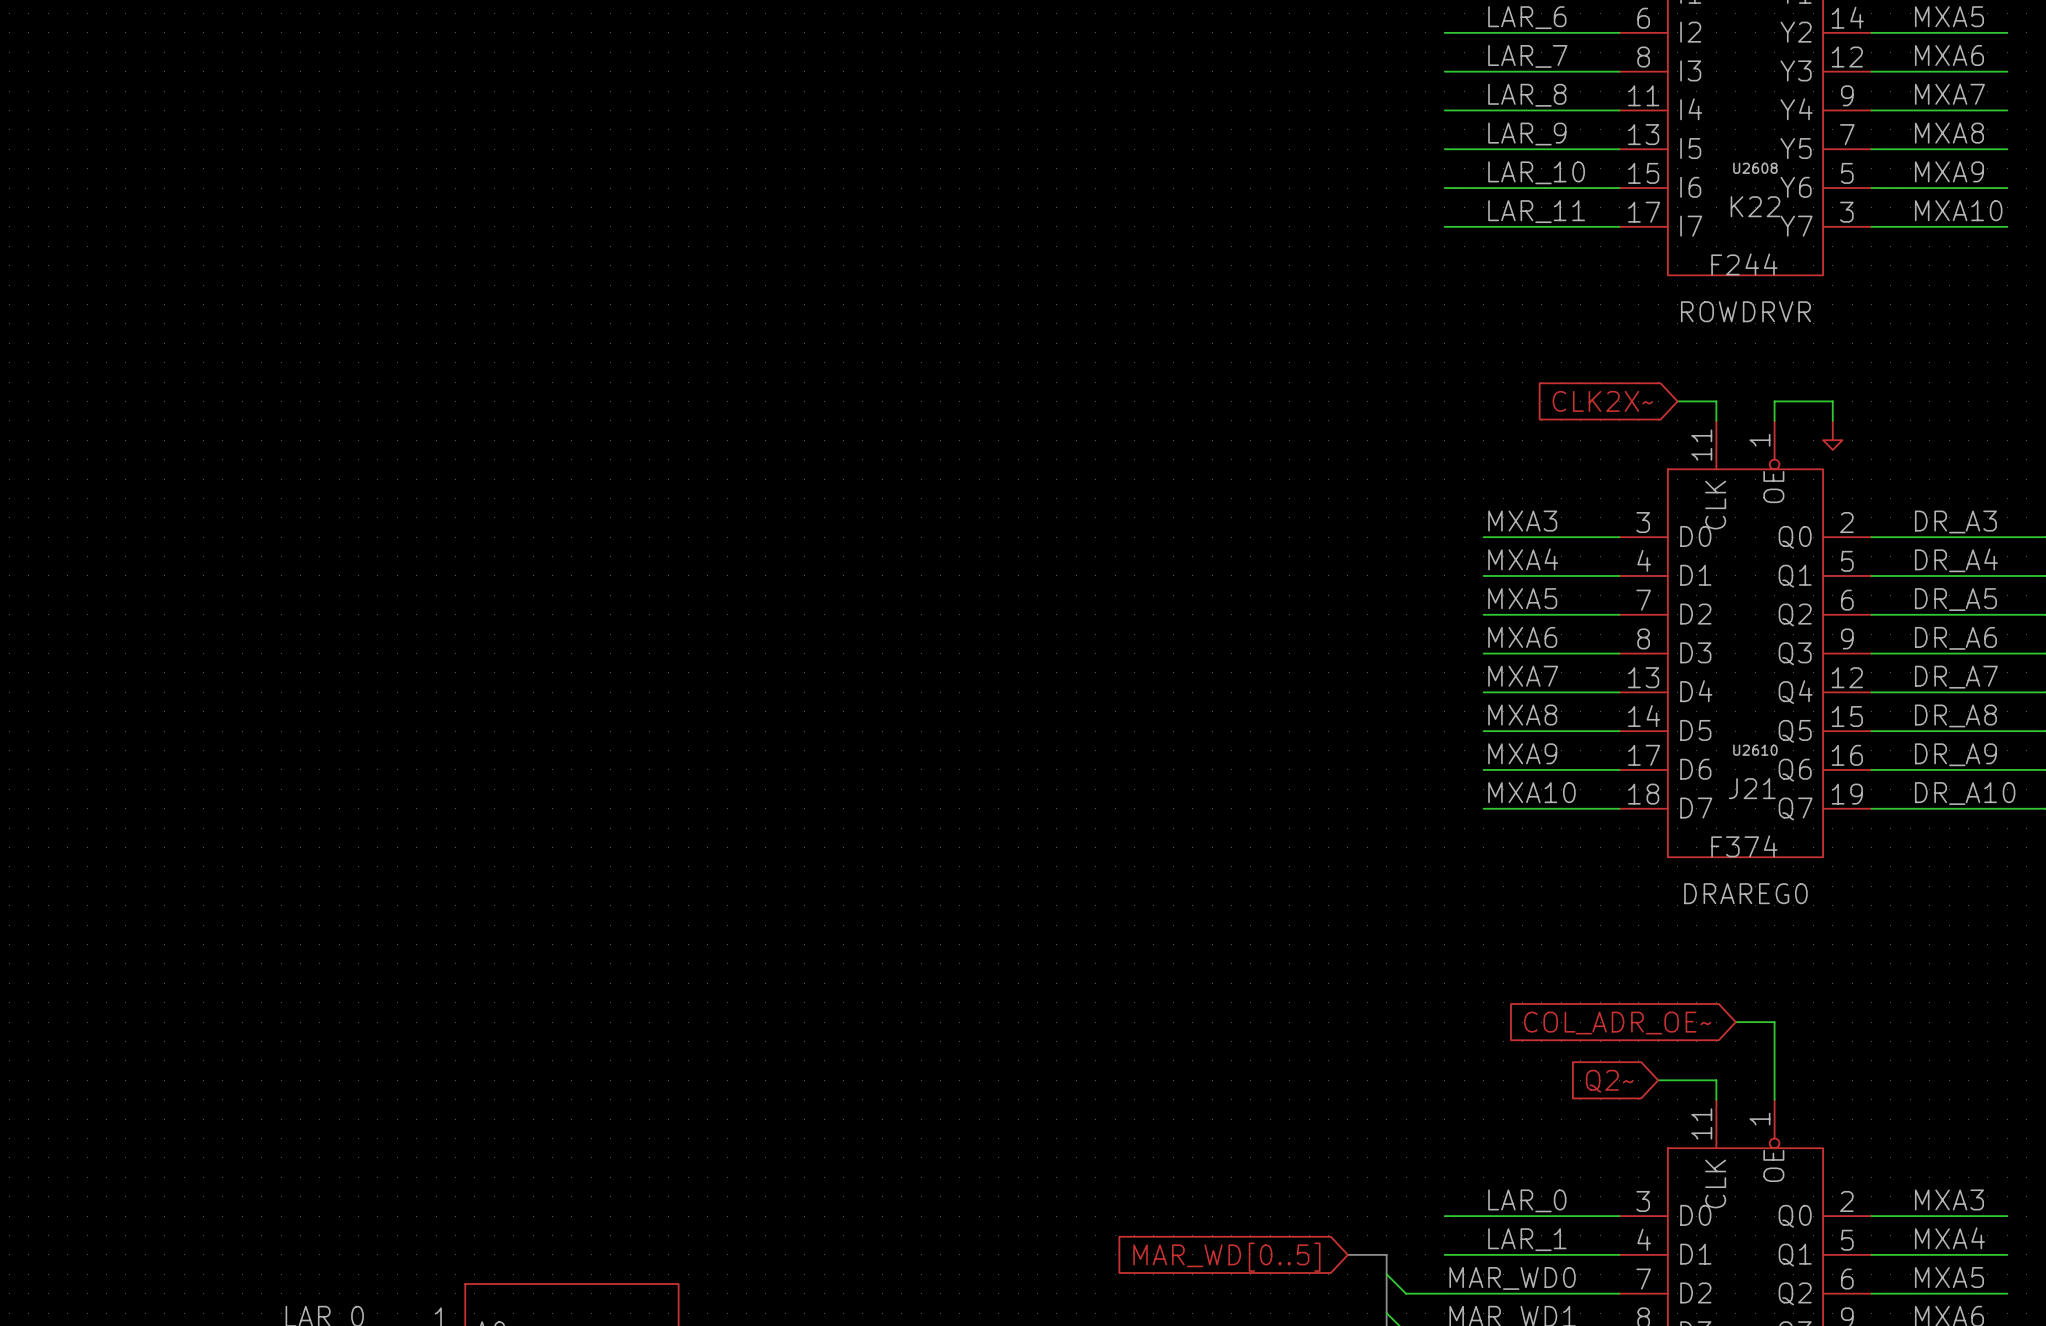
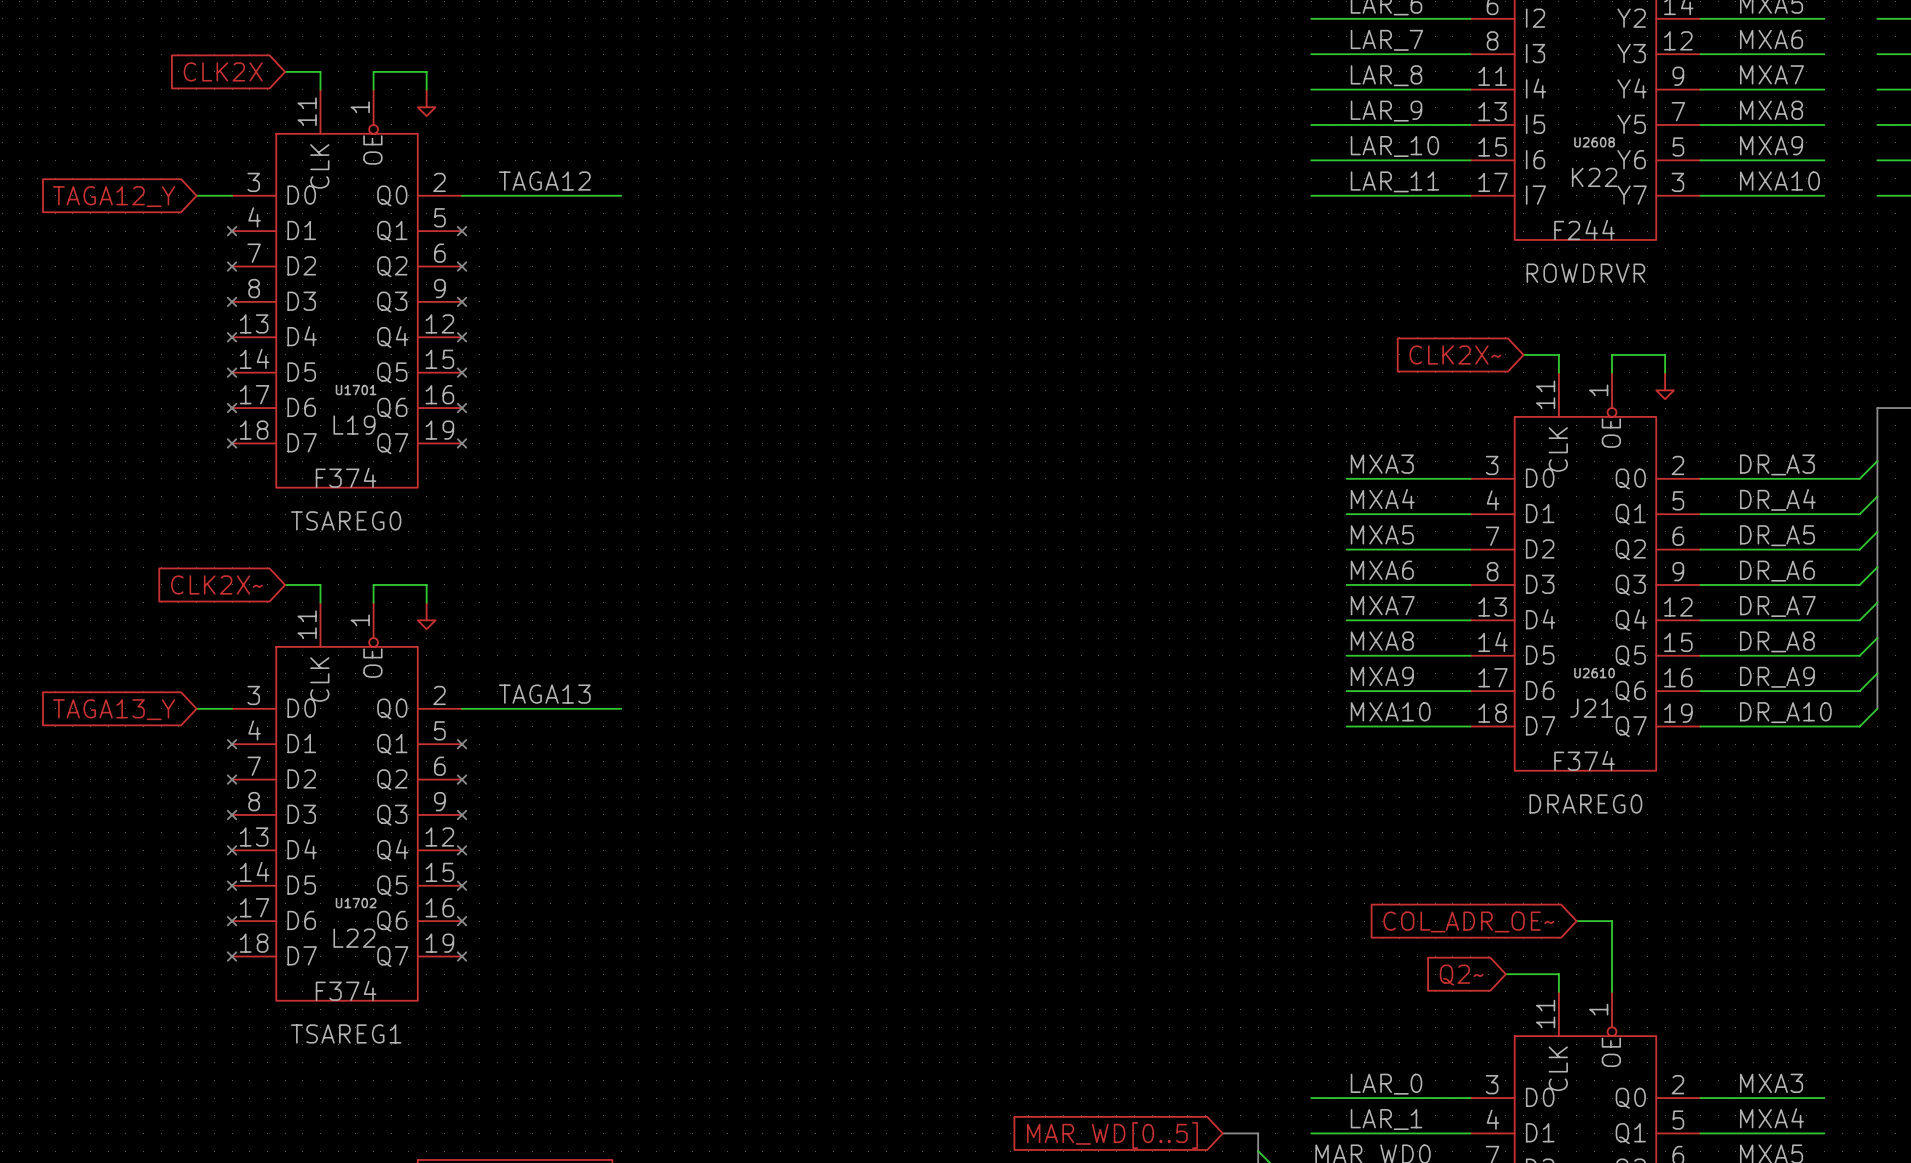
global label: none -> CLK2X (223, 71)
wire: none -> (285, 71) (320, 71) (320, 89)
wire: none -> (373, 89) (373, 71) (426, 71) (426, 89)
power symbol: none -> (426, 103)
label: none -> TAGA12 (544, 181)
wire: none -> (196, 195) (232, 195)
wire: none -> (462, 195) (621, 195)
global label: none -> TAGA12_Y (114, 196)
no-connect mark: none -> (232, 231)
no-connect mark: none -> (462, 231)
no-connect mark: none -> (232, 266)
no-connect mark: none -> (462, 266)
U1701: none -> F374 (347, 288)
no-connect mark: none -> (232, 301)
no-connect mark: none -> (462, 301)
no-connect mark: none -> (232, 337)
no-connect mark: none -> (462, 337)
no-connect mark: none -> (232, 372)
no-connect mark: none -> (462, 372)
no-connect mark: none -> (232, 408)
no-connect mark: none -> (462, 408)
no-connect mark: none -> (232, 443)
no-connect mark: none -> (462, 443)
global label: none -> CLK2X~ (216, 584)
wire: none -> (285, 584) (320, 584) (320, 602)
wire: none -> (373, 602) (373, 584) (426, 584) (426, 602)
power symbol: none -> (426, 616)
label: none -> TAGA13 (544, 694)
wire: none -> (196, 708) (232, 708)
wire: none -> (462, 708) (621, 708)
global label: none -> TAGA13_Y (114, 709)
no-connect mark: none -> (232, 744)
no-connect mark: none -> (462, 744)
no-connect mark: none -> (232, 779)
no-connect mark: none -> (462, 779)
U1702: none -> F374 (347, 801)
no-connect mark: none -> (232, 814)
no-connect mark: none -> (462, 814)
no-connect mark: none -> (232, 850)
no-connect mark: none -> (462, 850)
no-connect mark: none -> (232, 885)
no-connect mark: none -> (462, 885)
no-connect mark: none -> (232, 921)
no-connect mark: none -> (462, 921)
no-connect mark: none -> (232, 956)
no-connect mark: none -> (462, 956)

